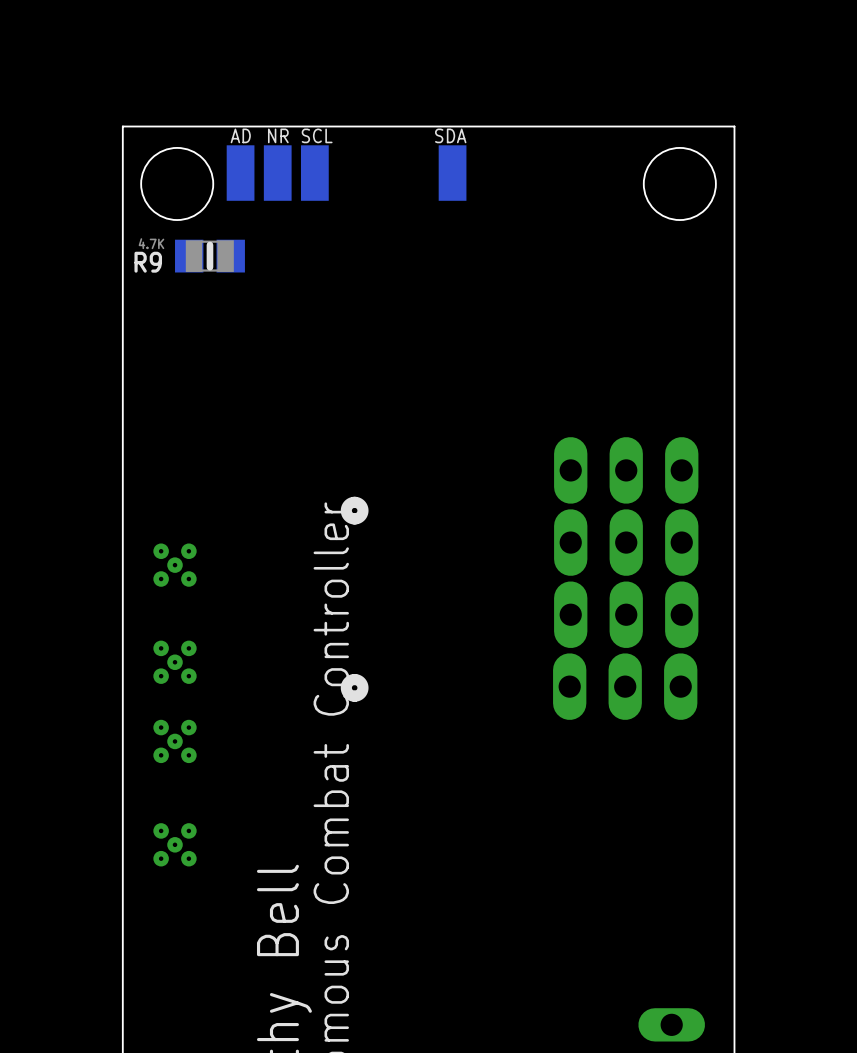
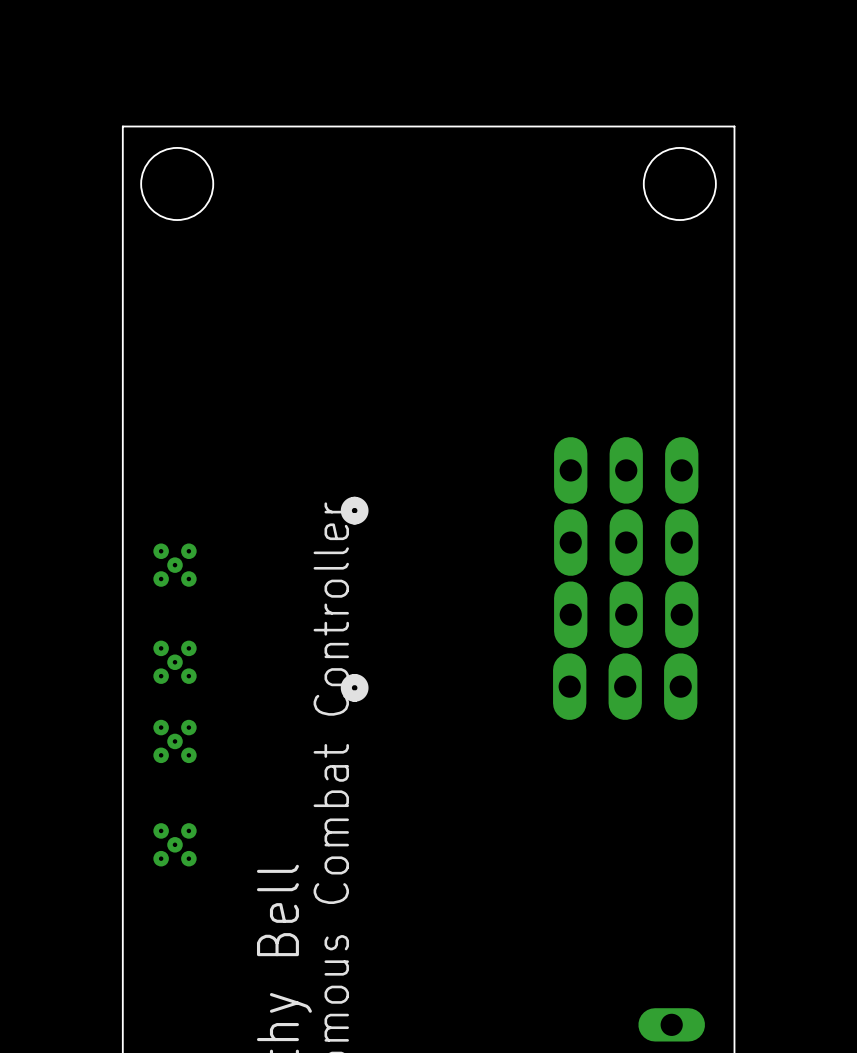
AD: (240, 173) -> none
NR: (277, 173) -> none
SCL: (314, 173) -> none
SDA: (452, 173) -> none
R9: 4.7K (209, 256) -> none

